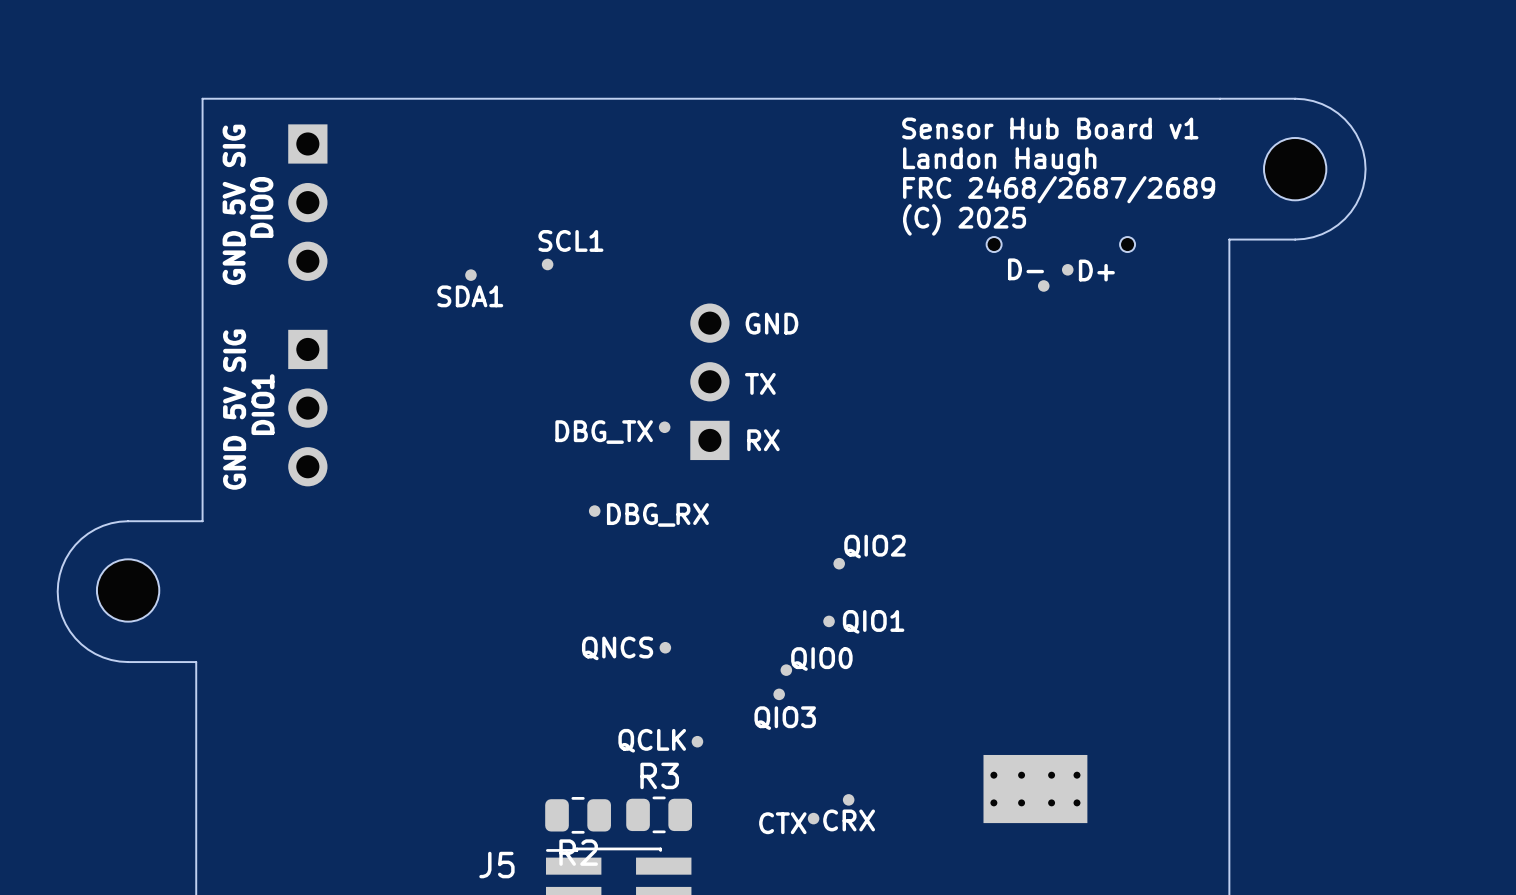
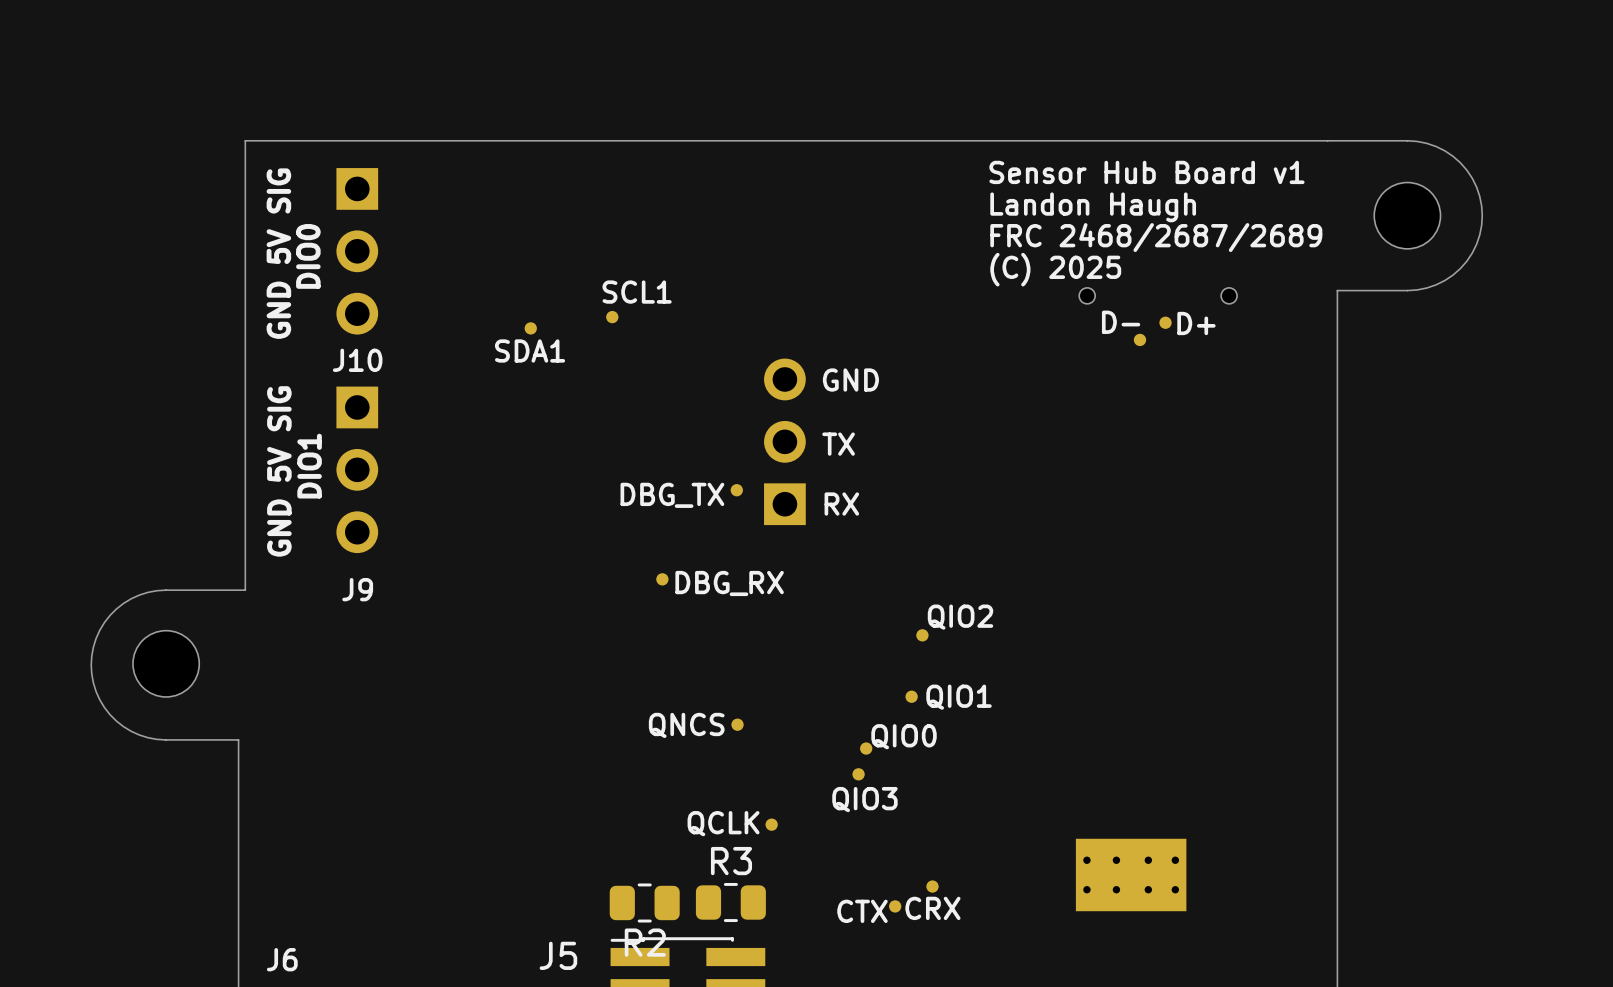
J10 name: none -> J10 (357, 360)
J9 name: none -> J9 (357, 589)
J6 name: none -> J6 (282, 959)

